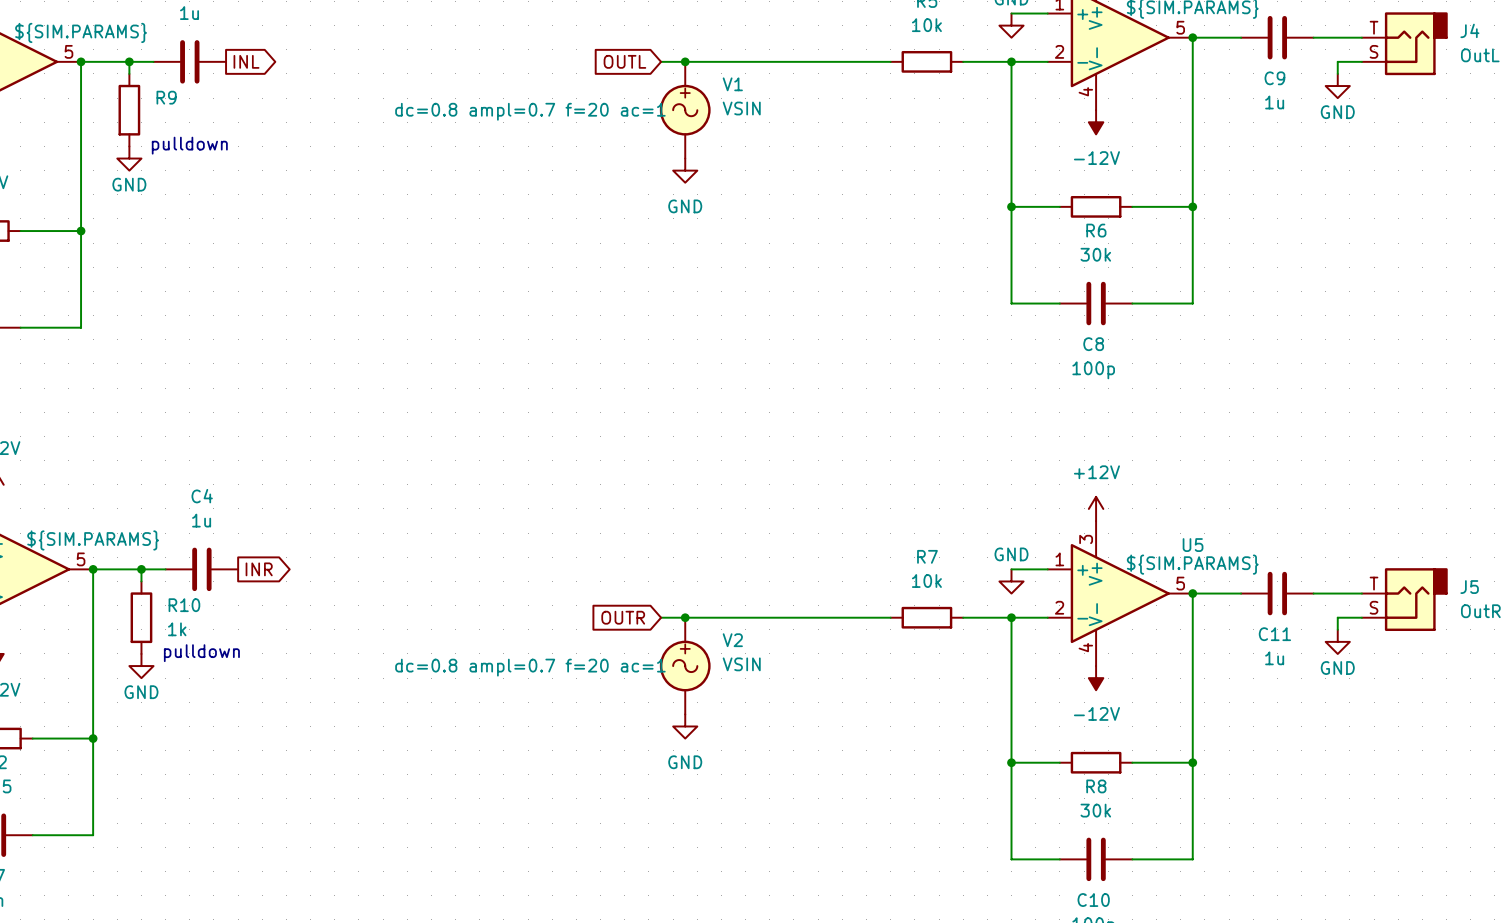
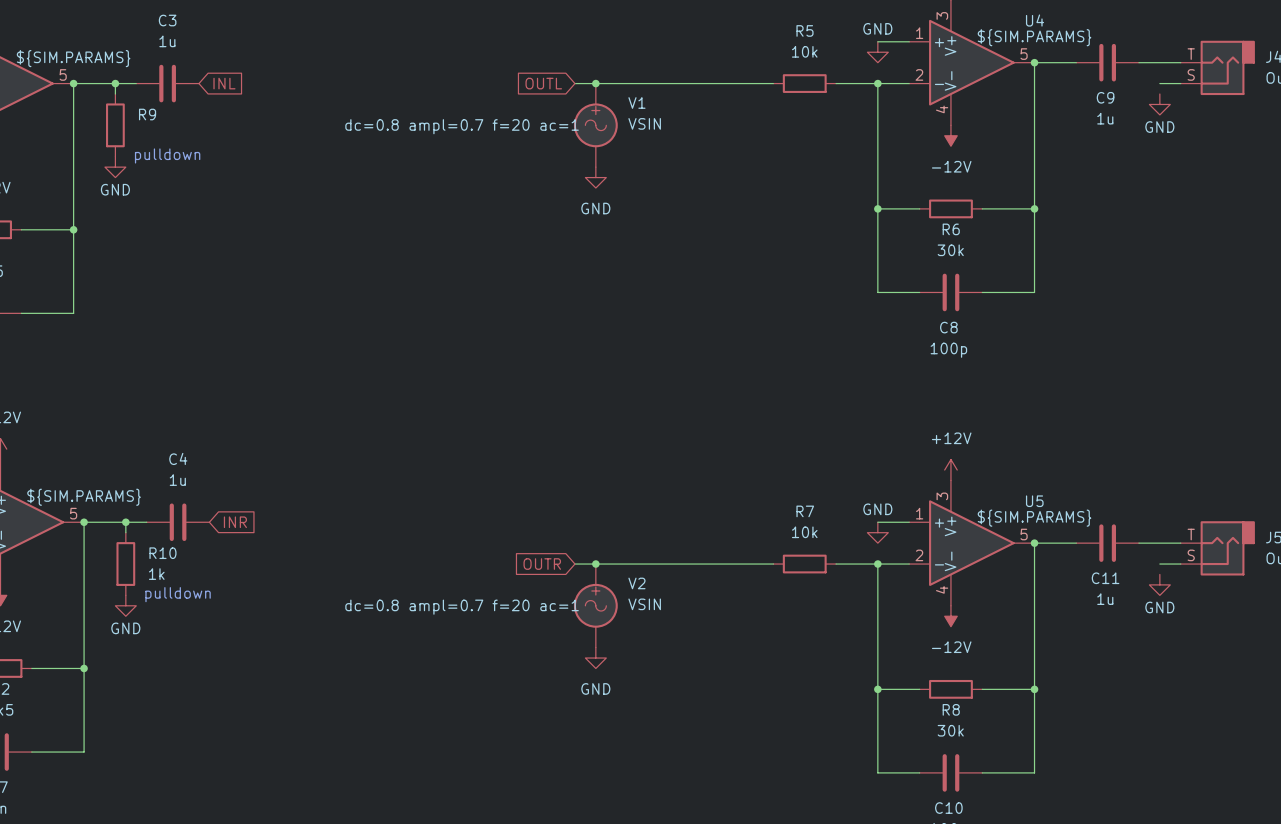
global label shape: output (246, 61) -> input (224, 83)
wire: (1337, 61) (1337, 73) -> none
global label shape: output (259, 569) -> input (235, 522)
wire: (1337, 617) (1337, 629) -> none

